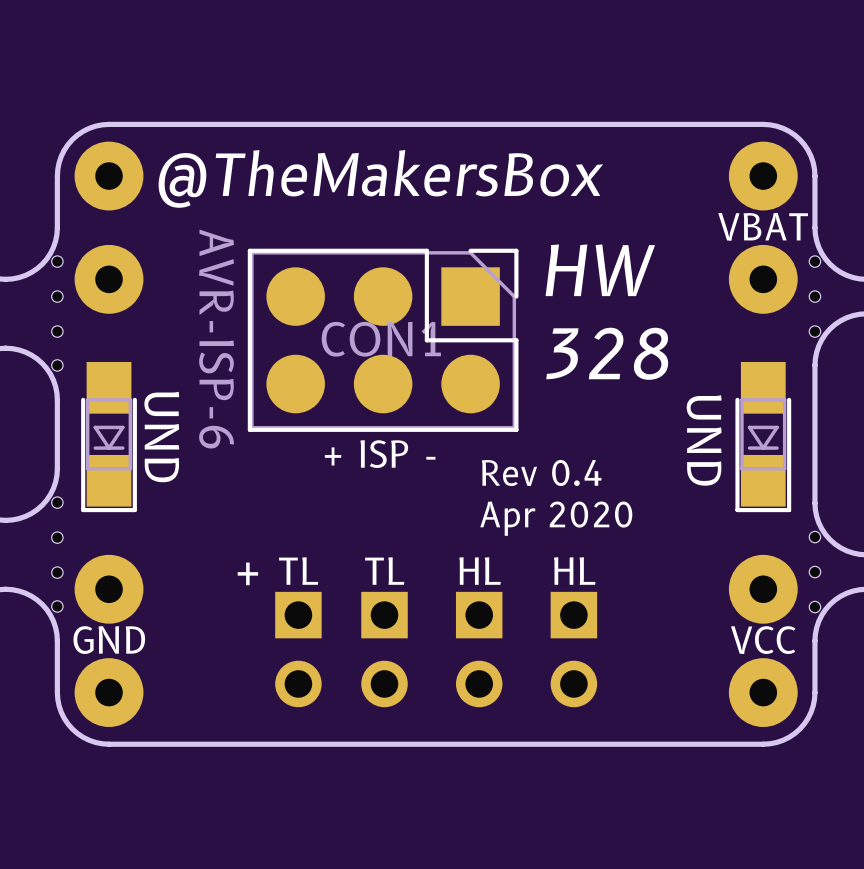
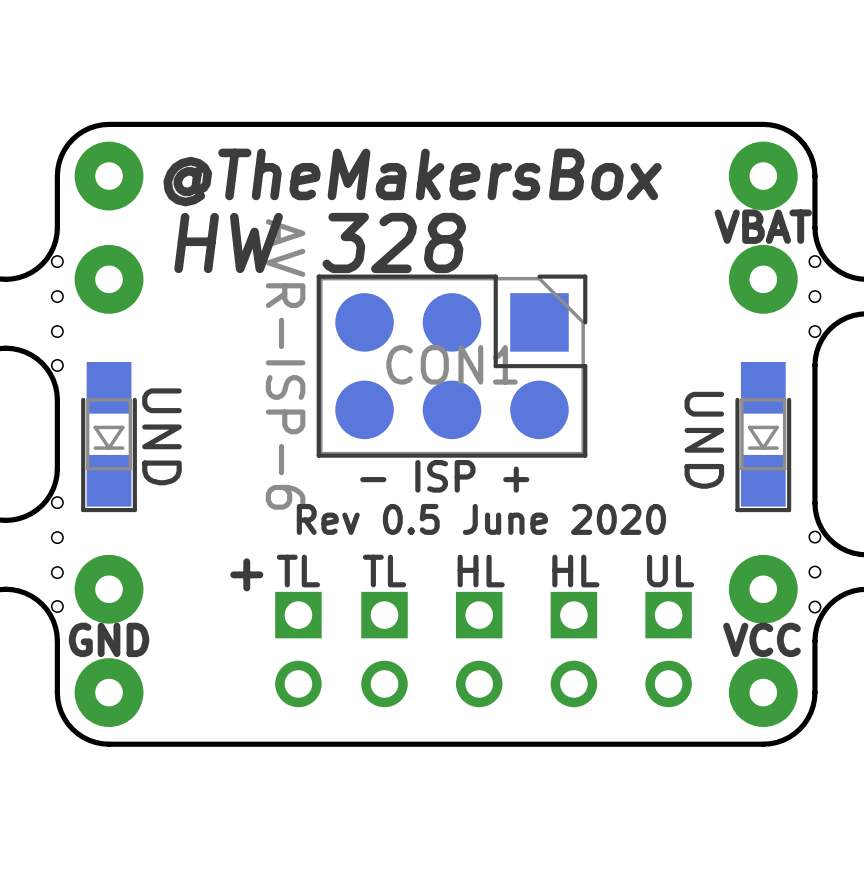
text: none -> HW 328 (320, 242)
text: HW (600, 270) -> none
CON1 position: (383, 340) -> (452, 366)
text: 328 (607, 353) -> none
text: + ISP - (380, 454) -> - ISP + (444, 476)
text: Rev 0.4 (541, 472) -> none
text: Apr 2020 (556, 518) -> none
text: none -> Rev 0.5 June 2020 (481, 519)
part: none -> UL (668, 649)

